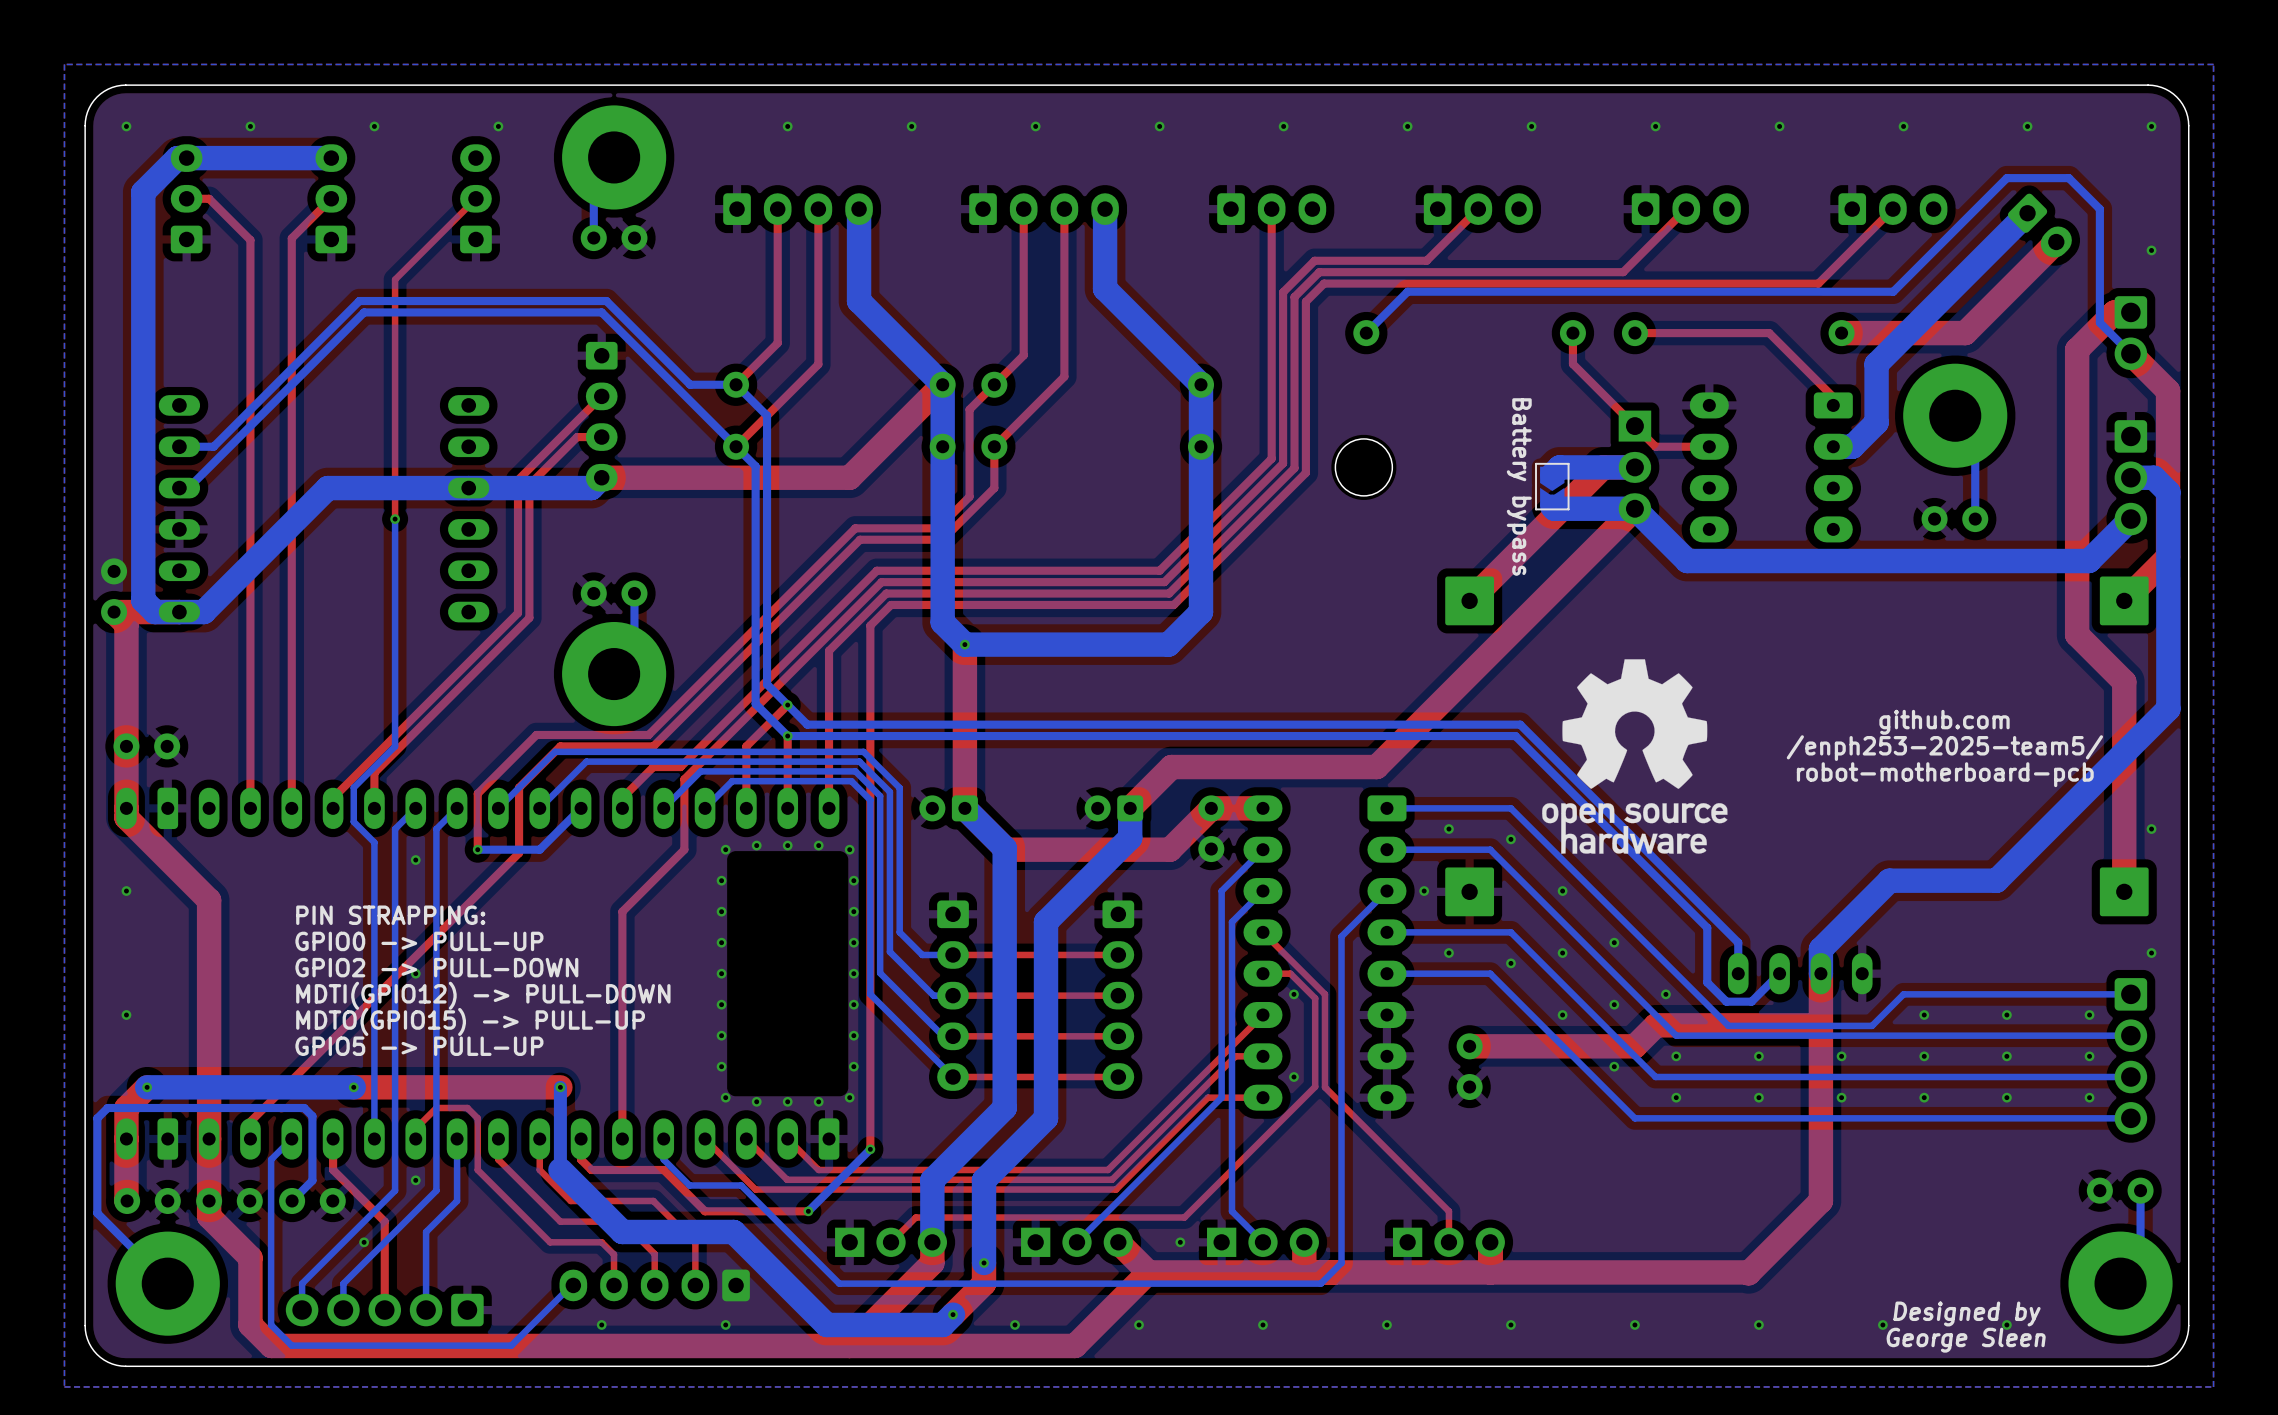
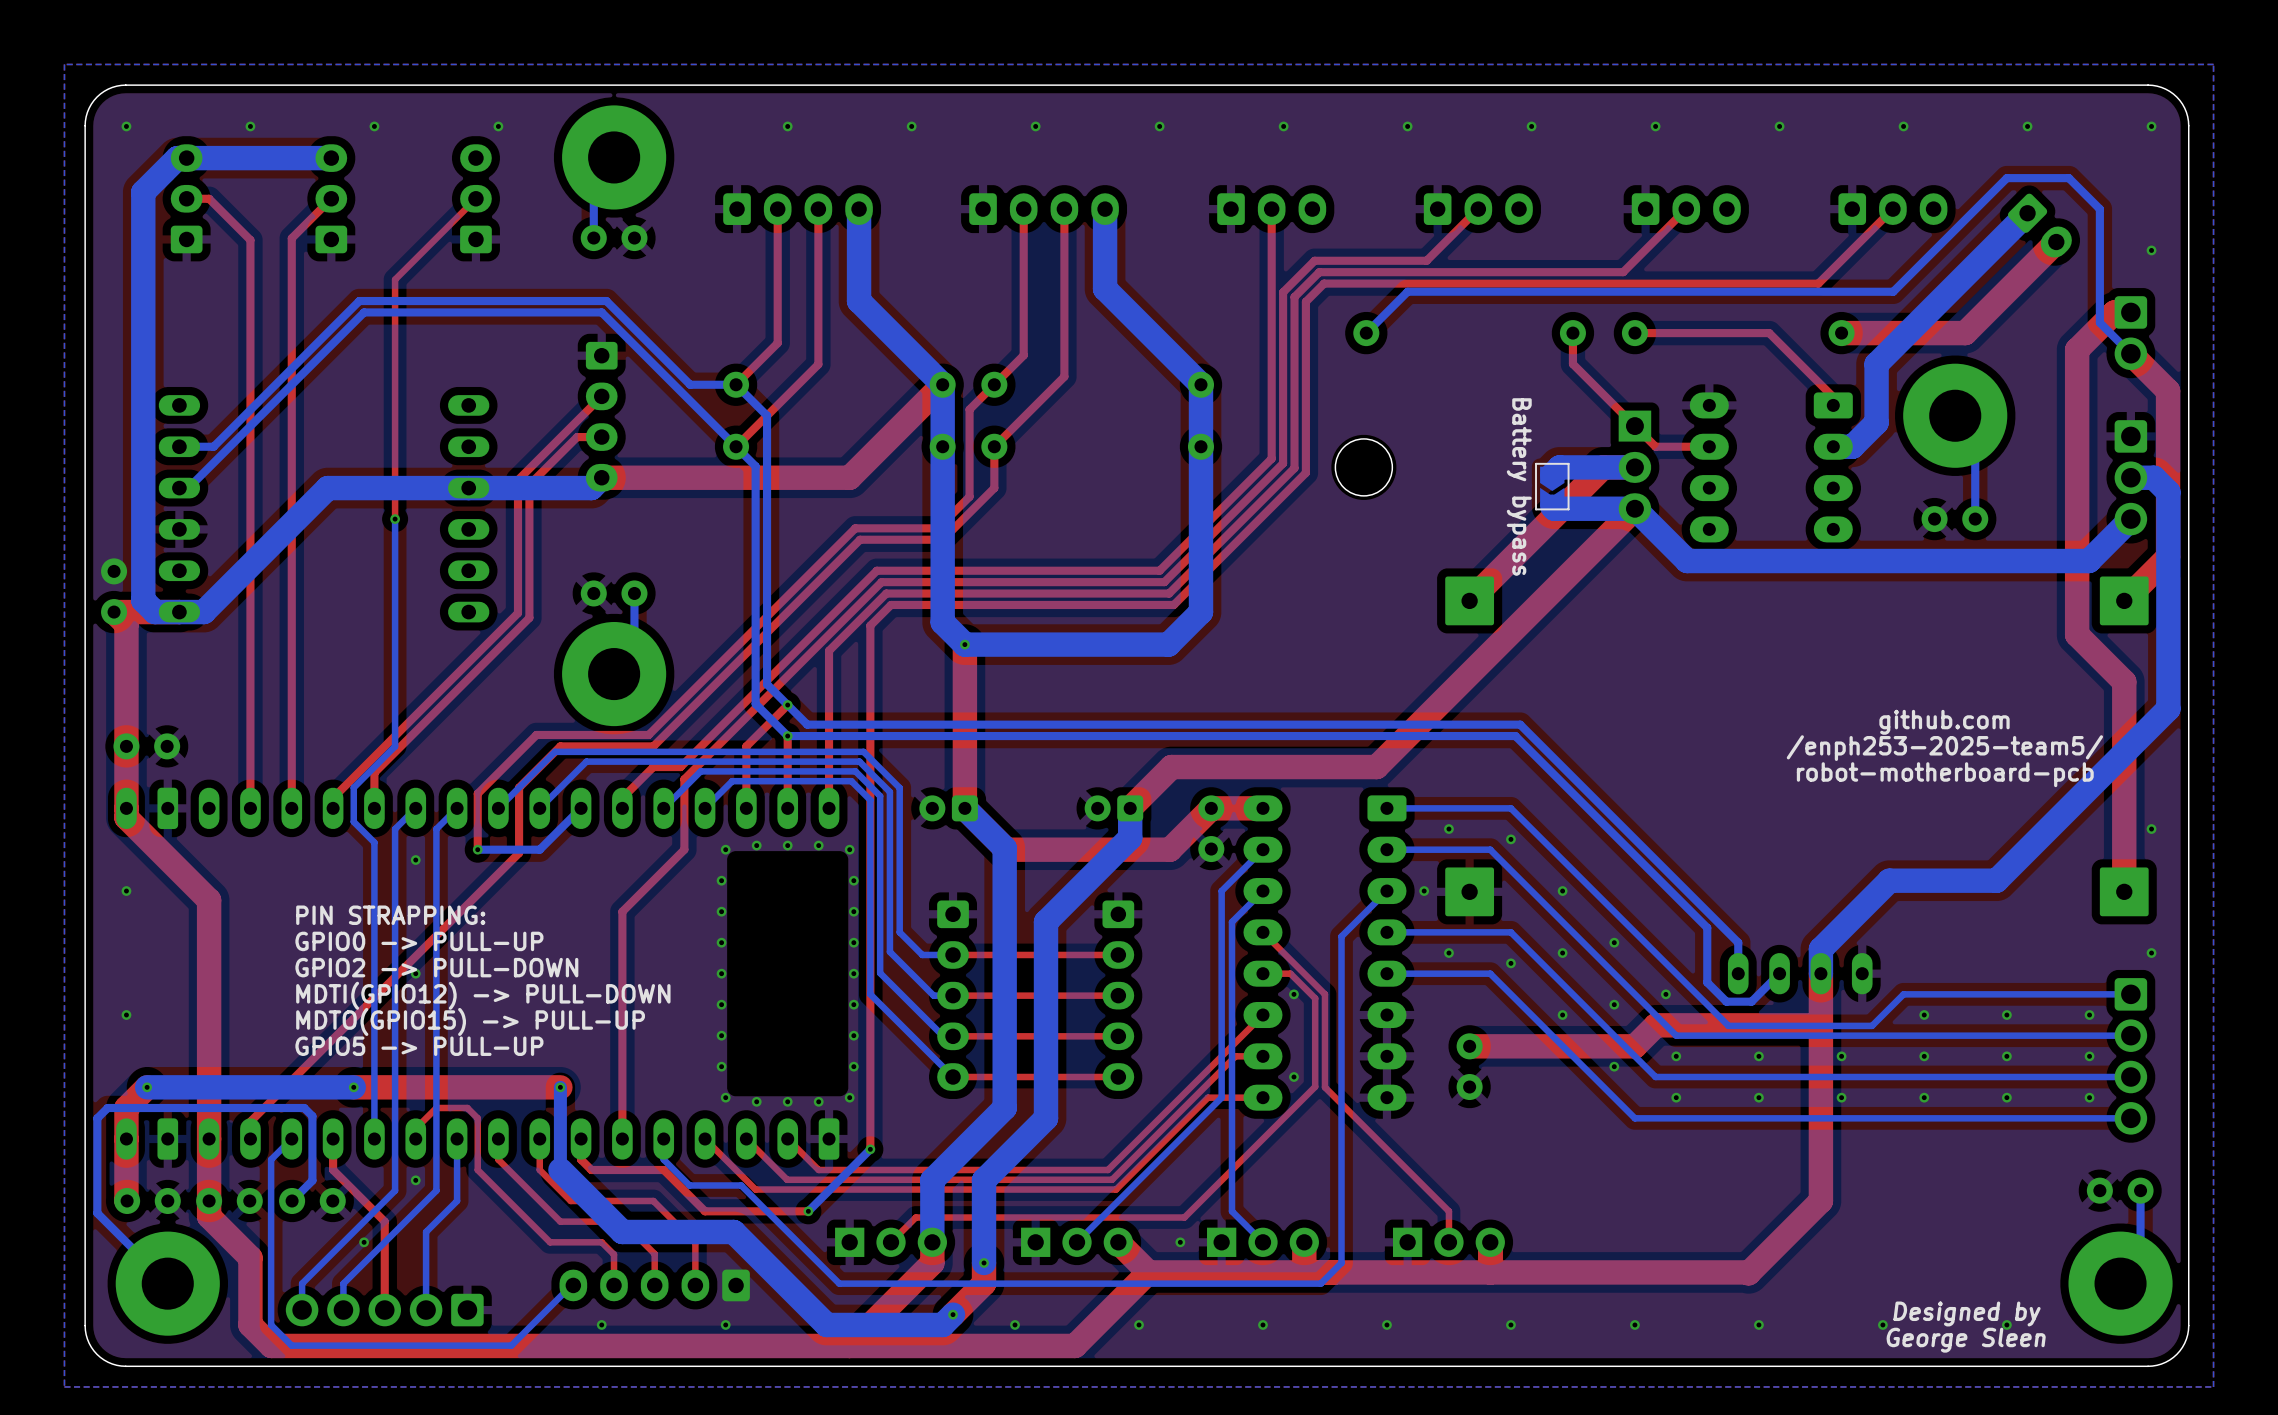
drawing: [1542, 659, 1728, 854] -> none

